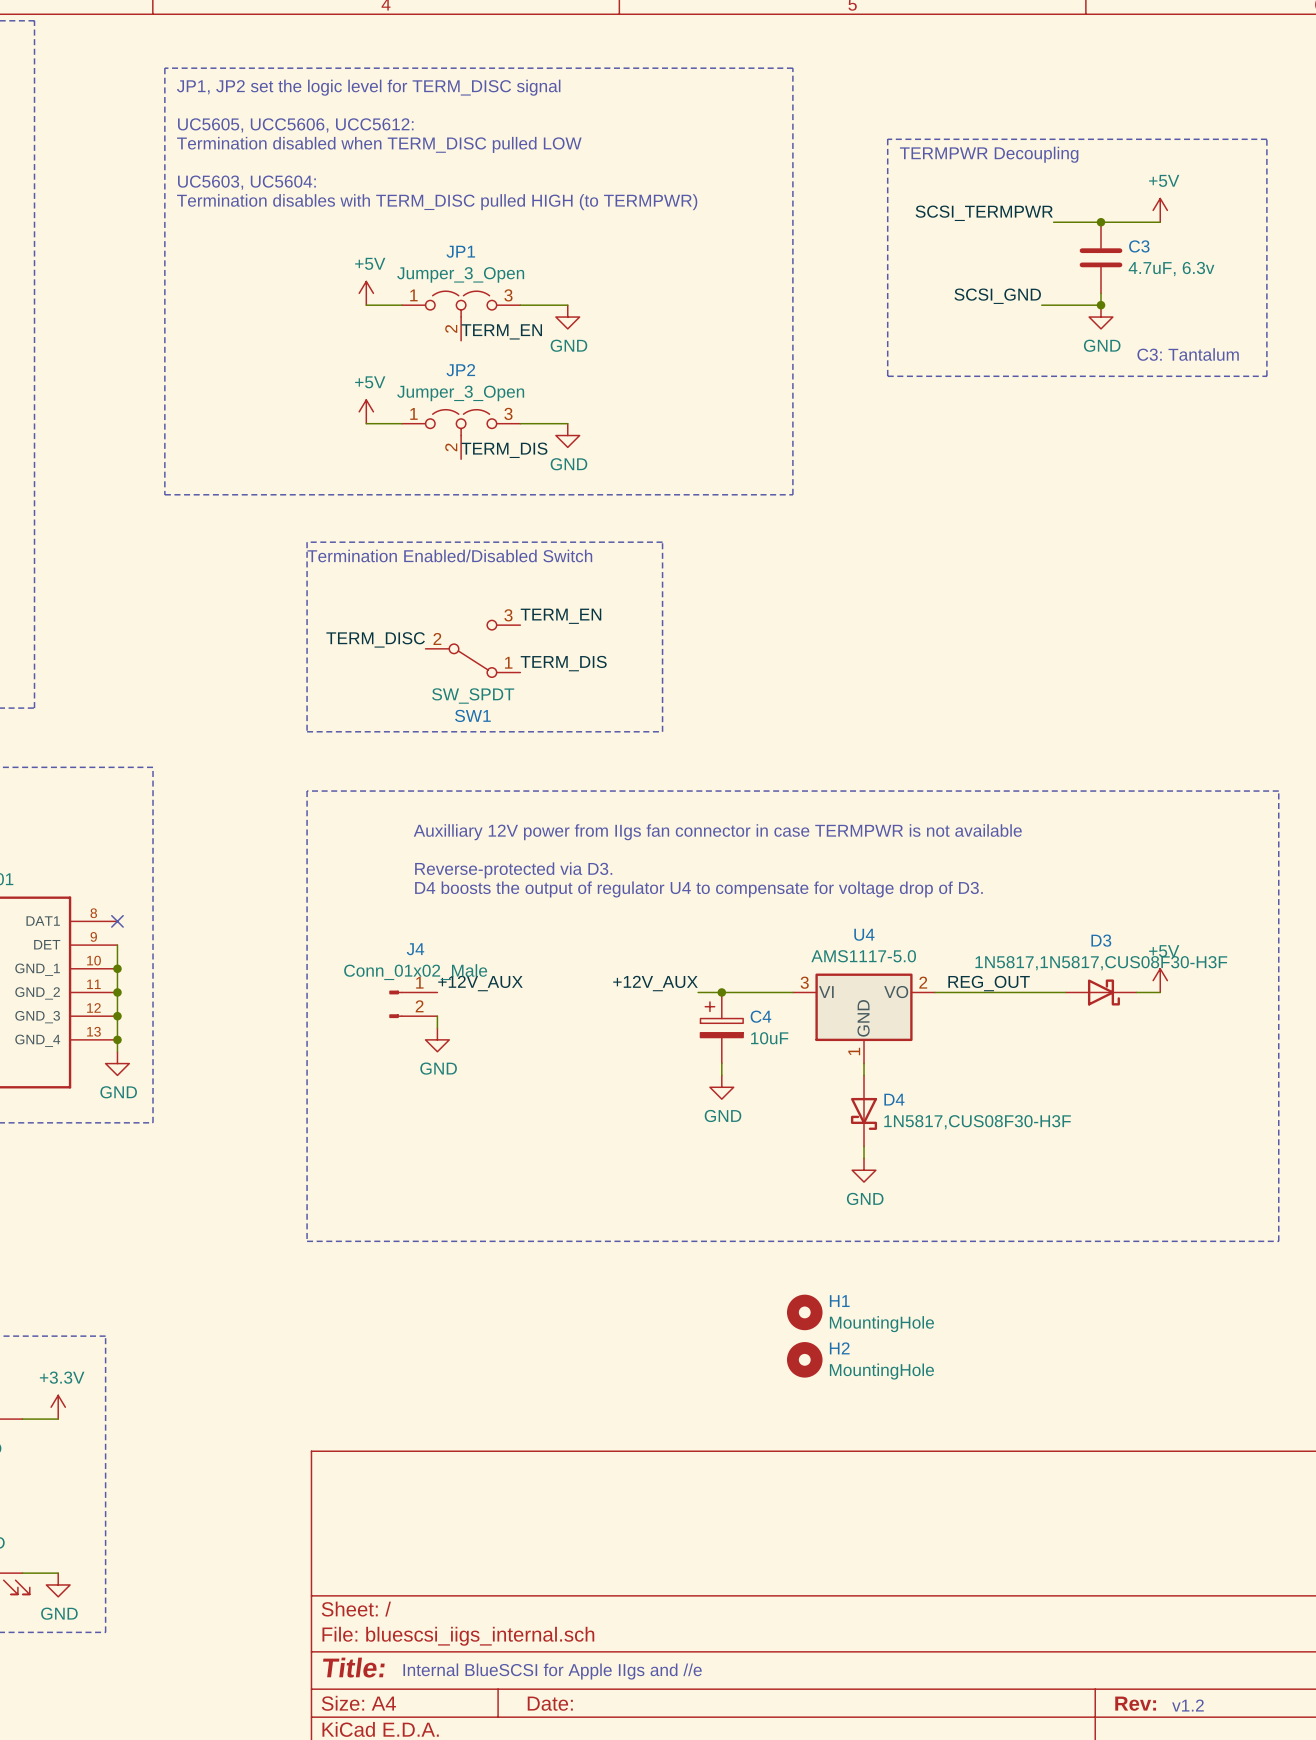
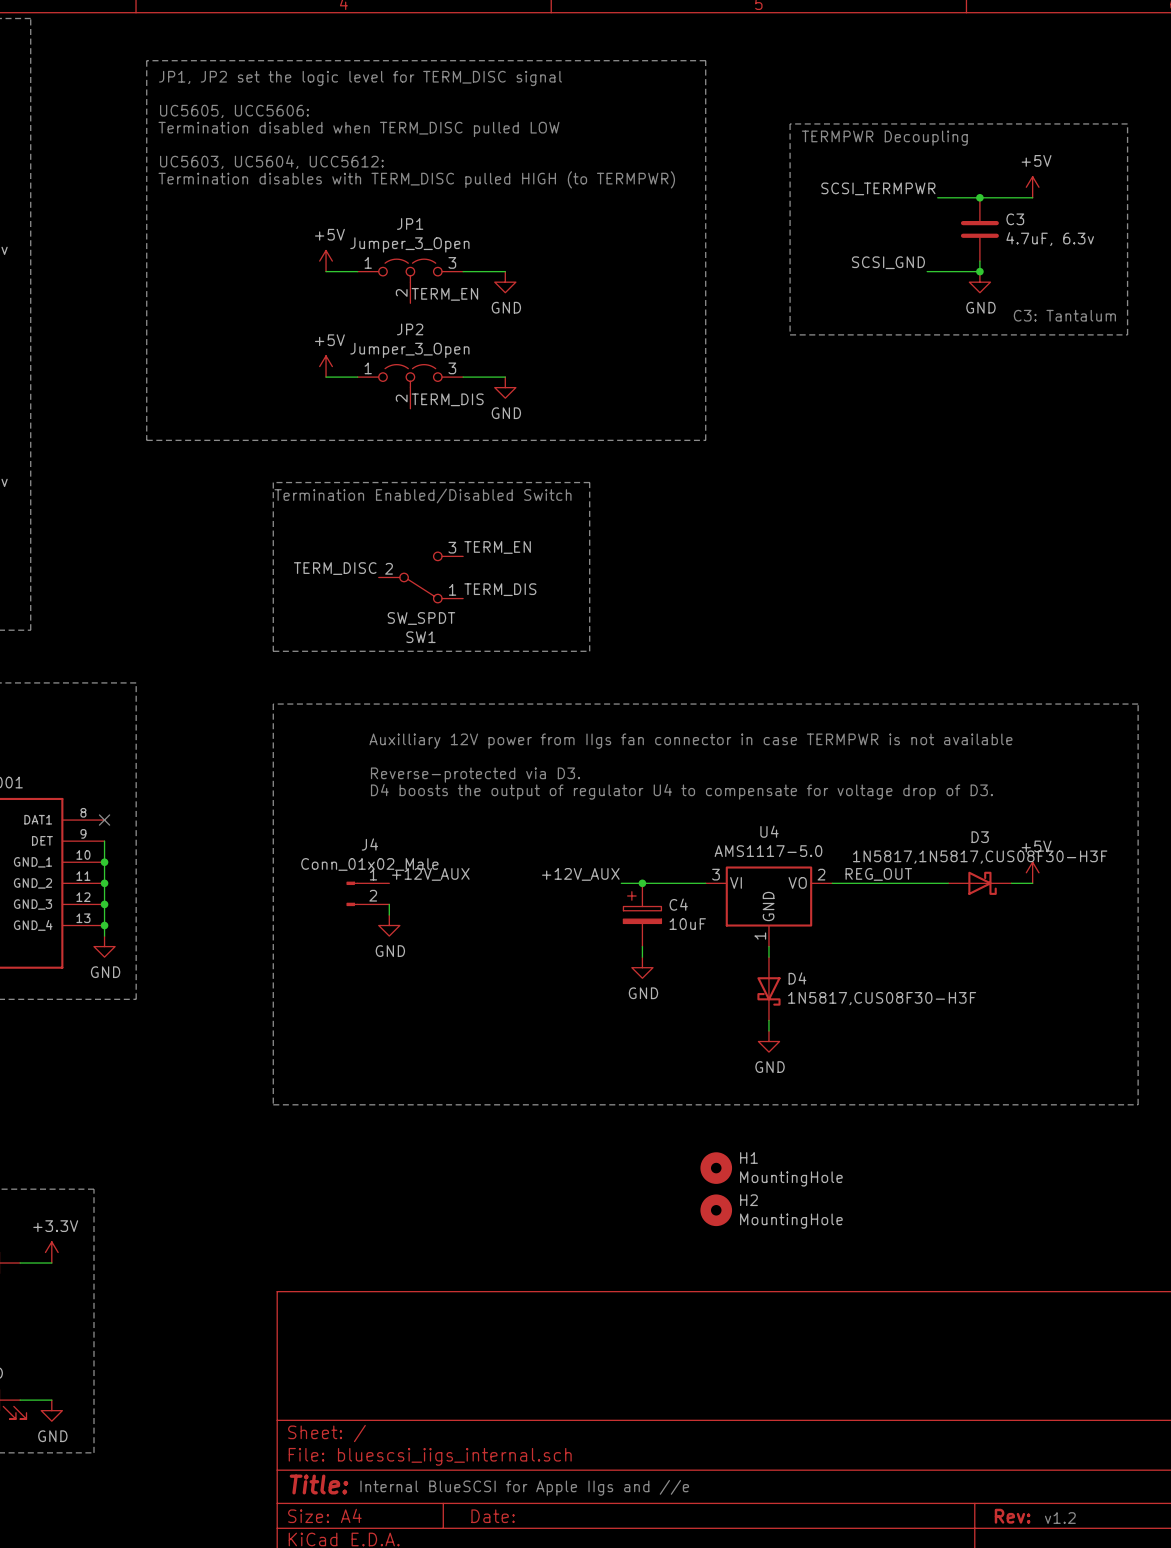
text: UC5605, UCC5606, UCC5612: (295, 125) -> UC5605, UCC5606: (234, 111)
text: UC5603, UC5604: (246, 182) -> UC5603, UC5604, UCC5612: (271, 162)

